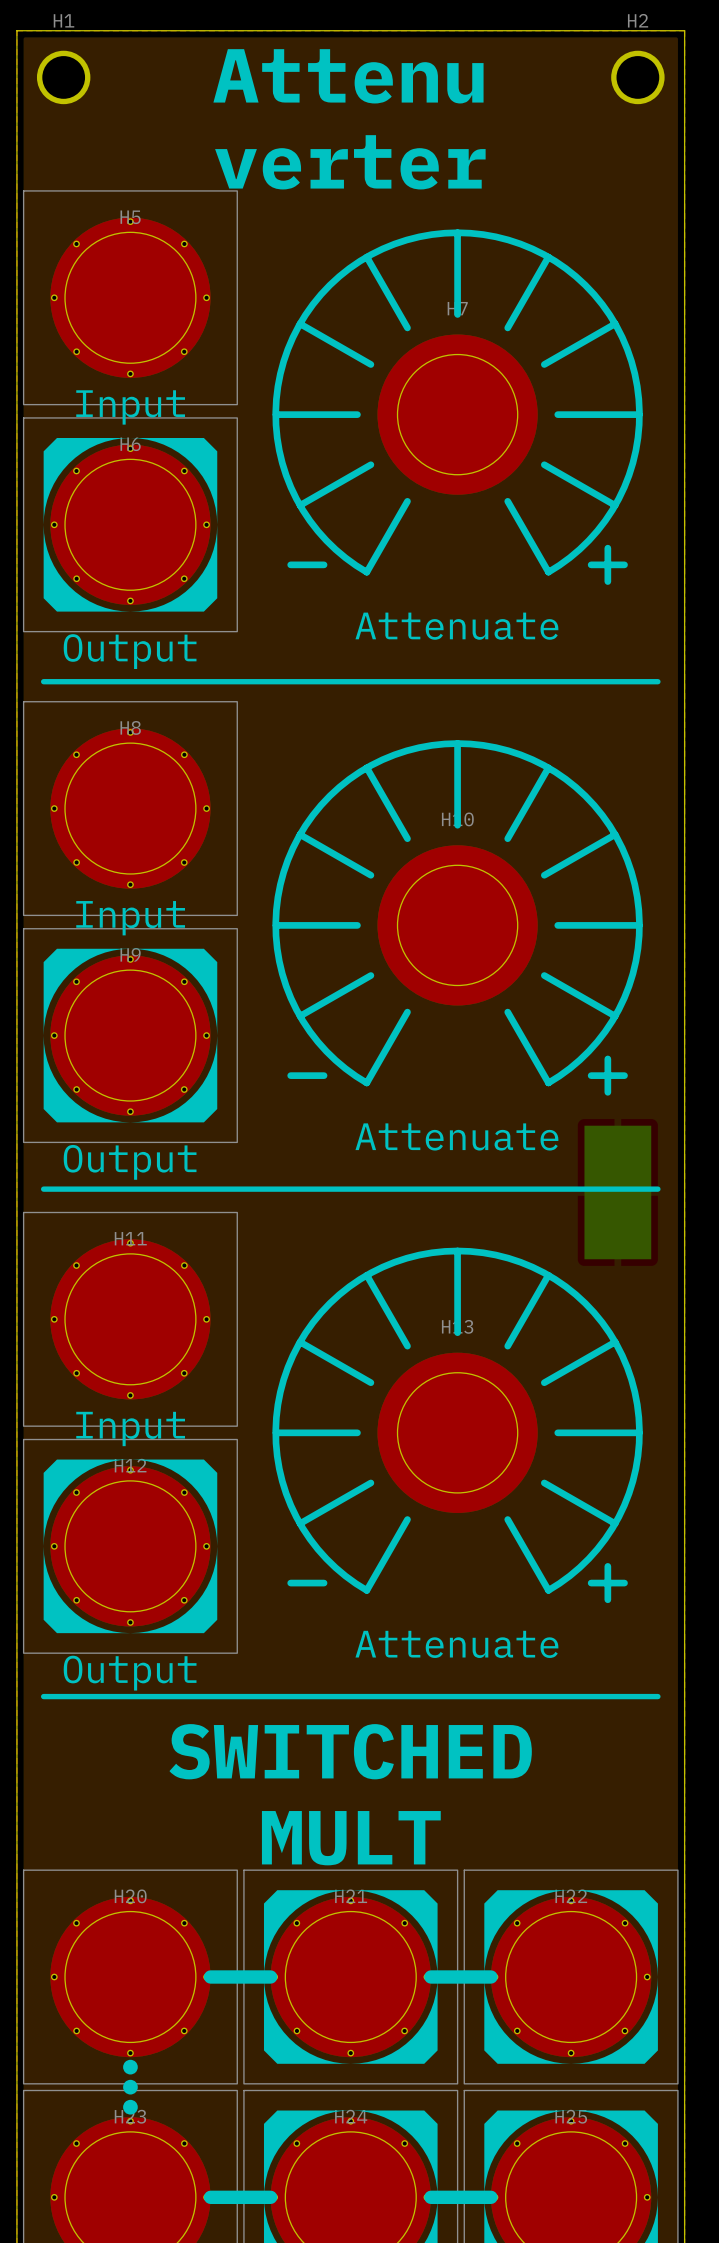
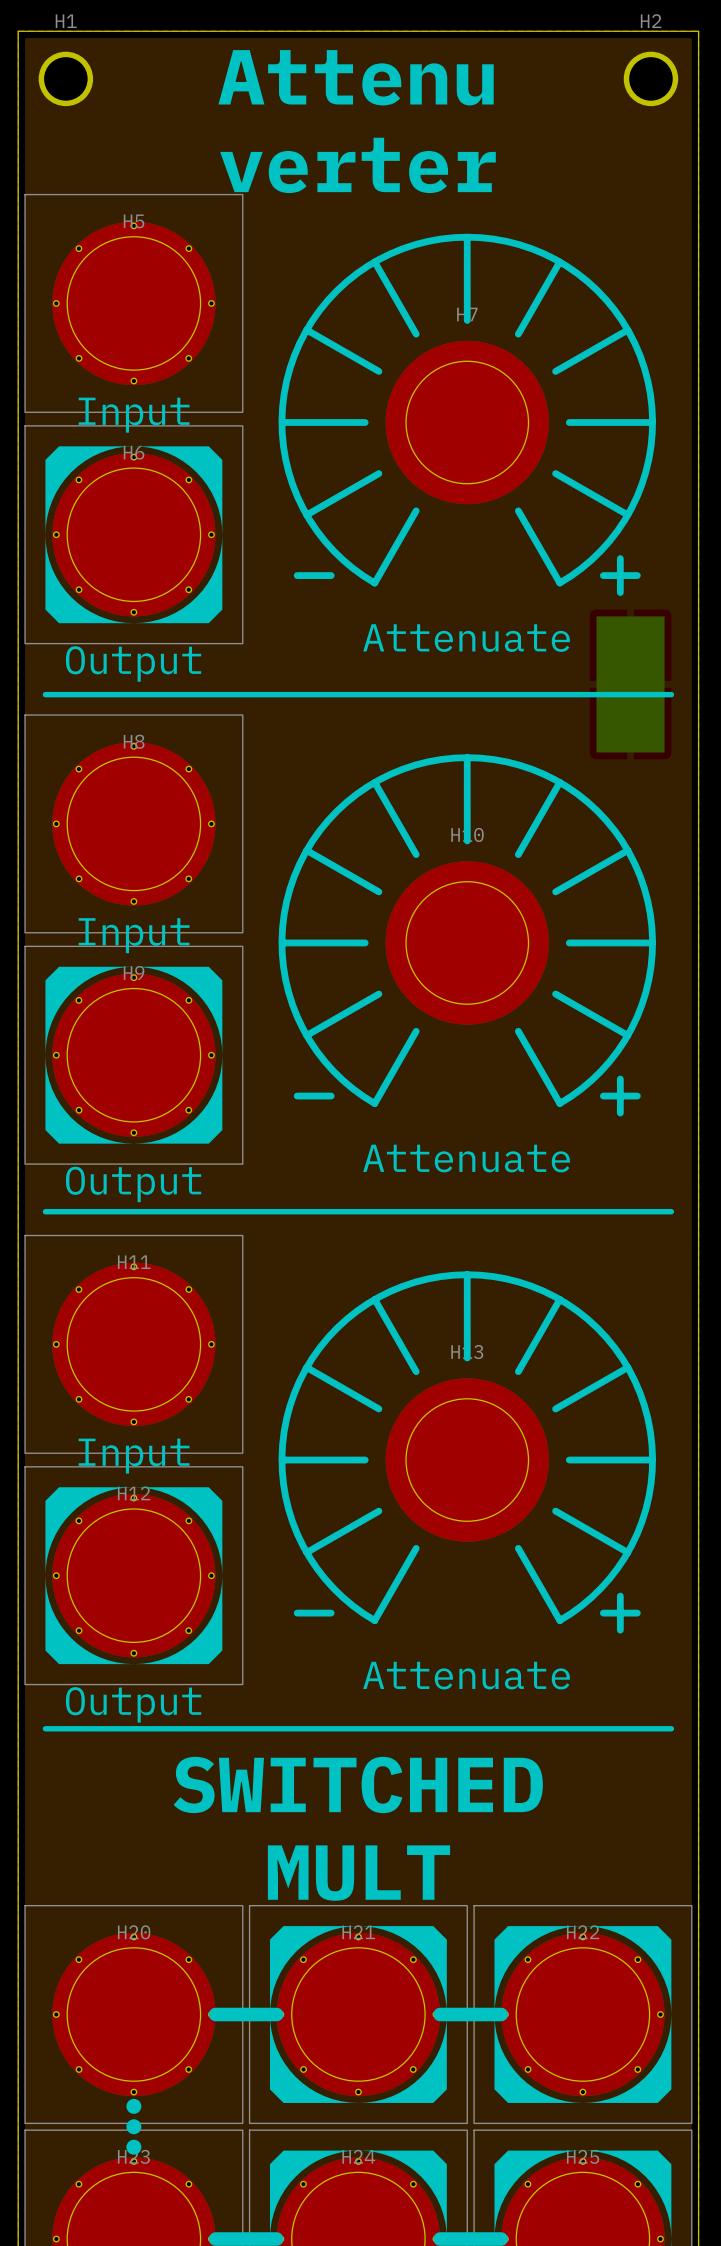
part: none -> (630, 684)
part: (617, 1192) -> none

